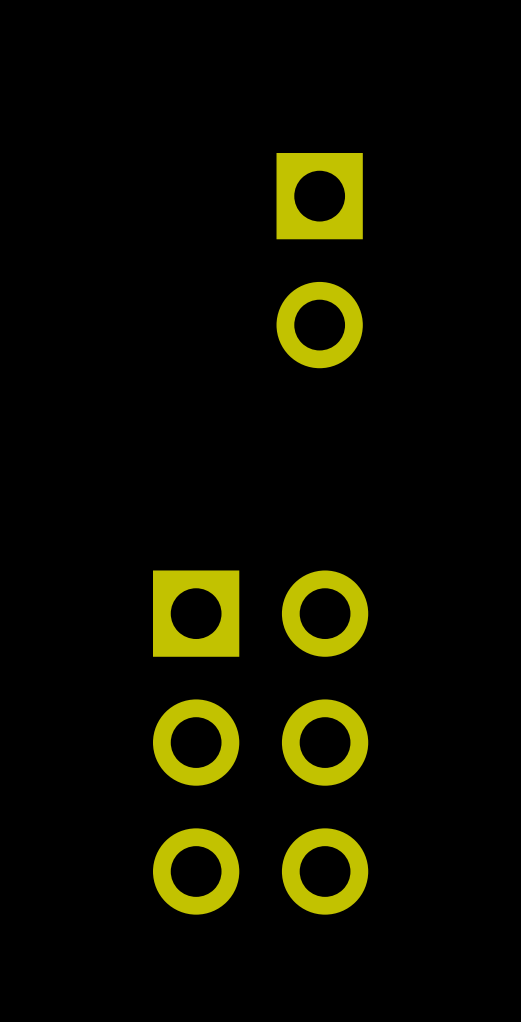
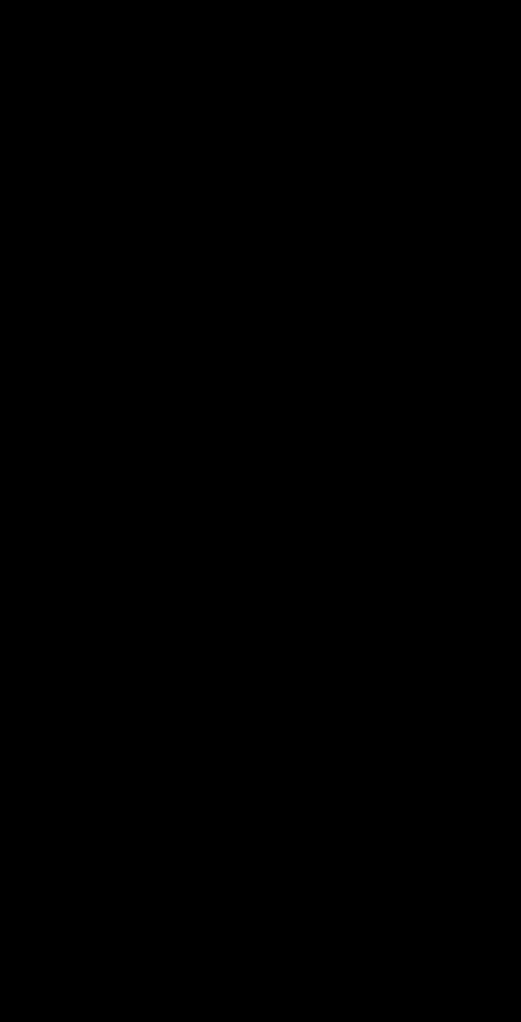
part: (319, 260) -> none
part: (260, 742) -> none

